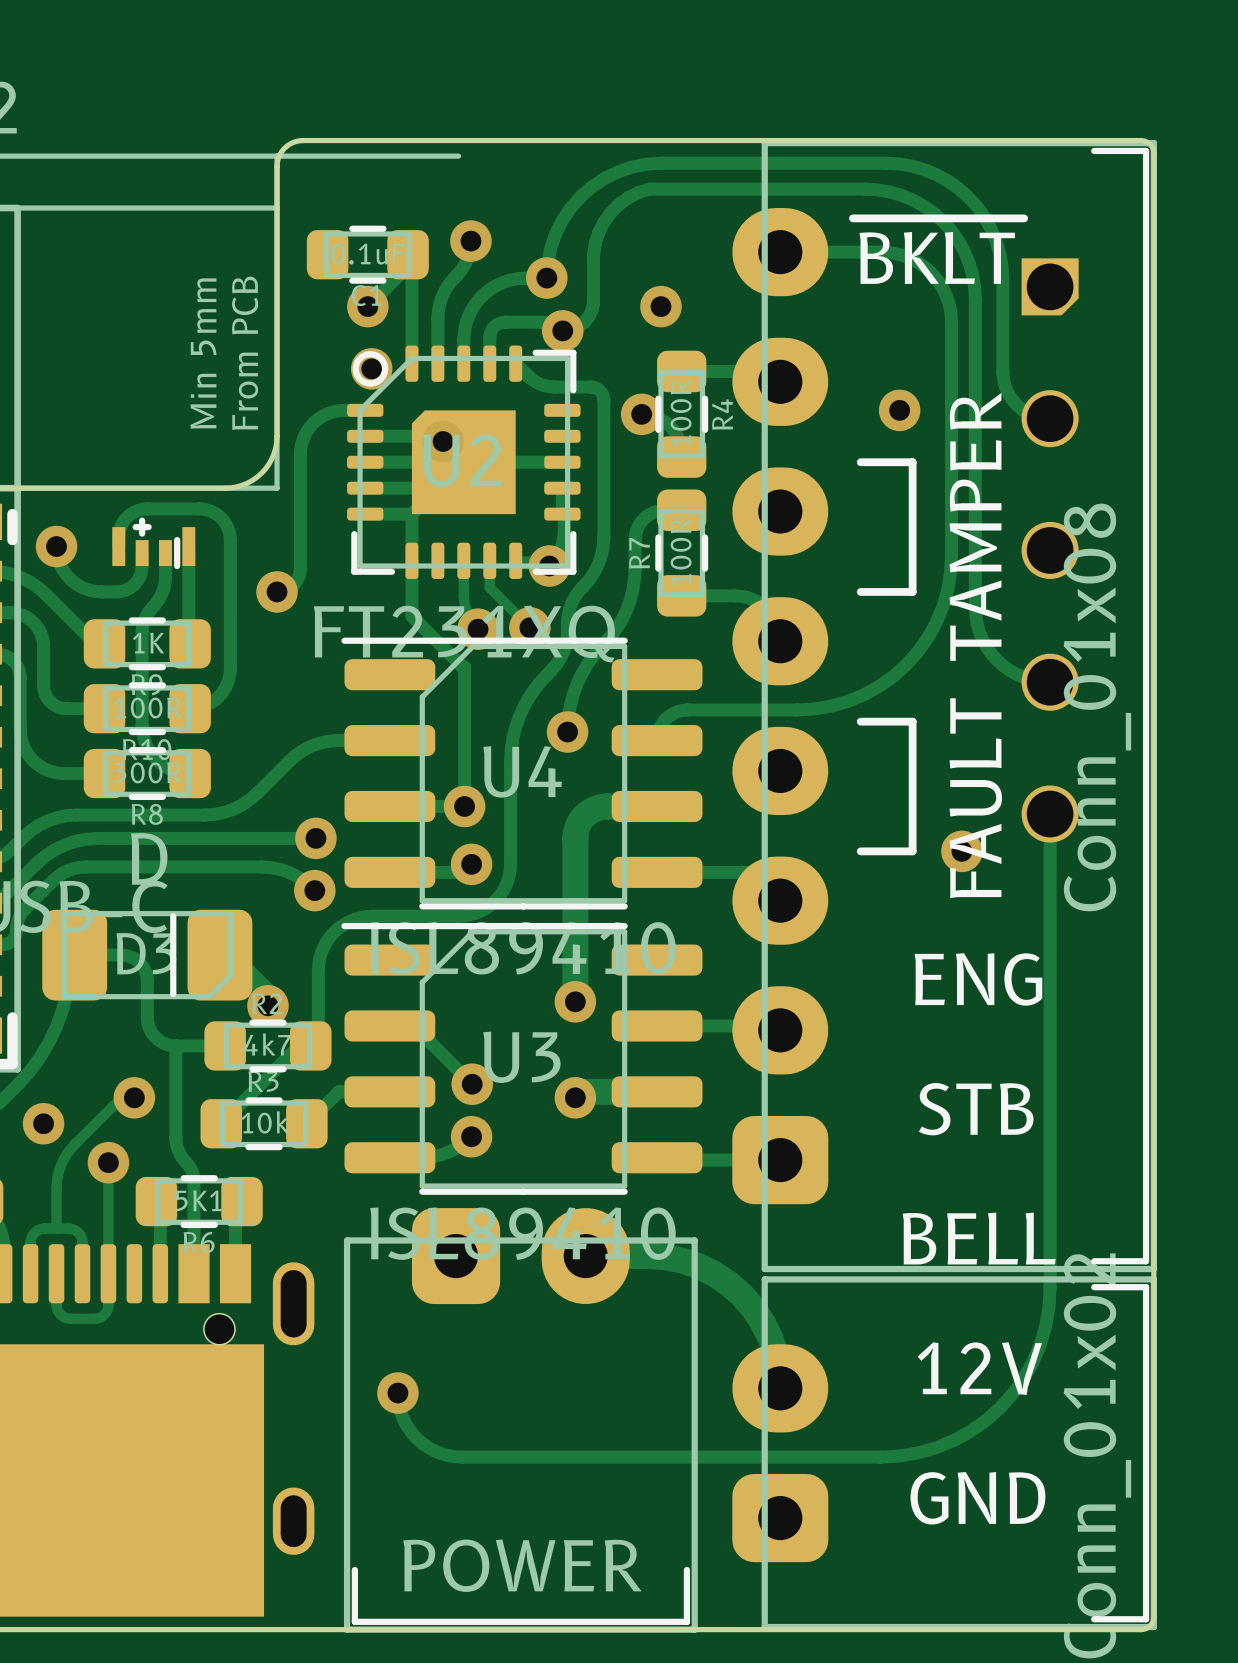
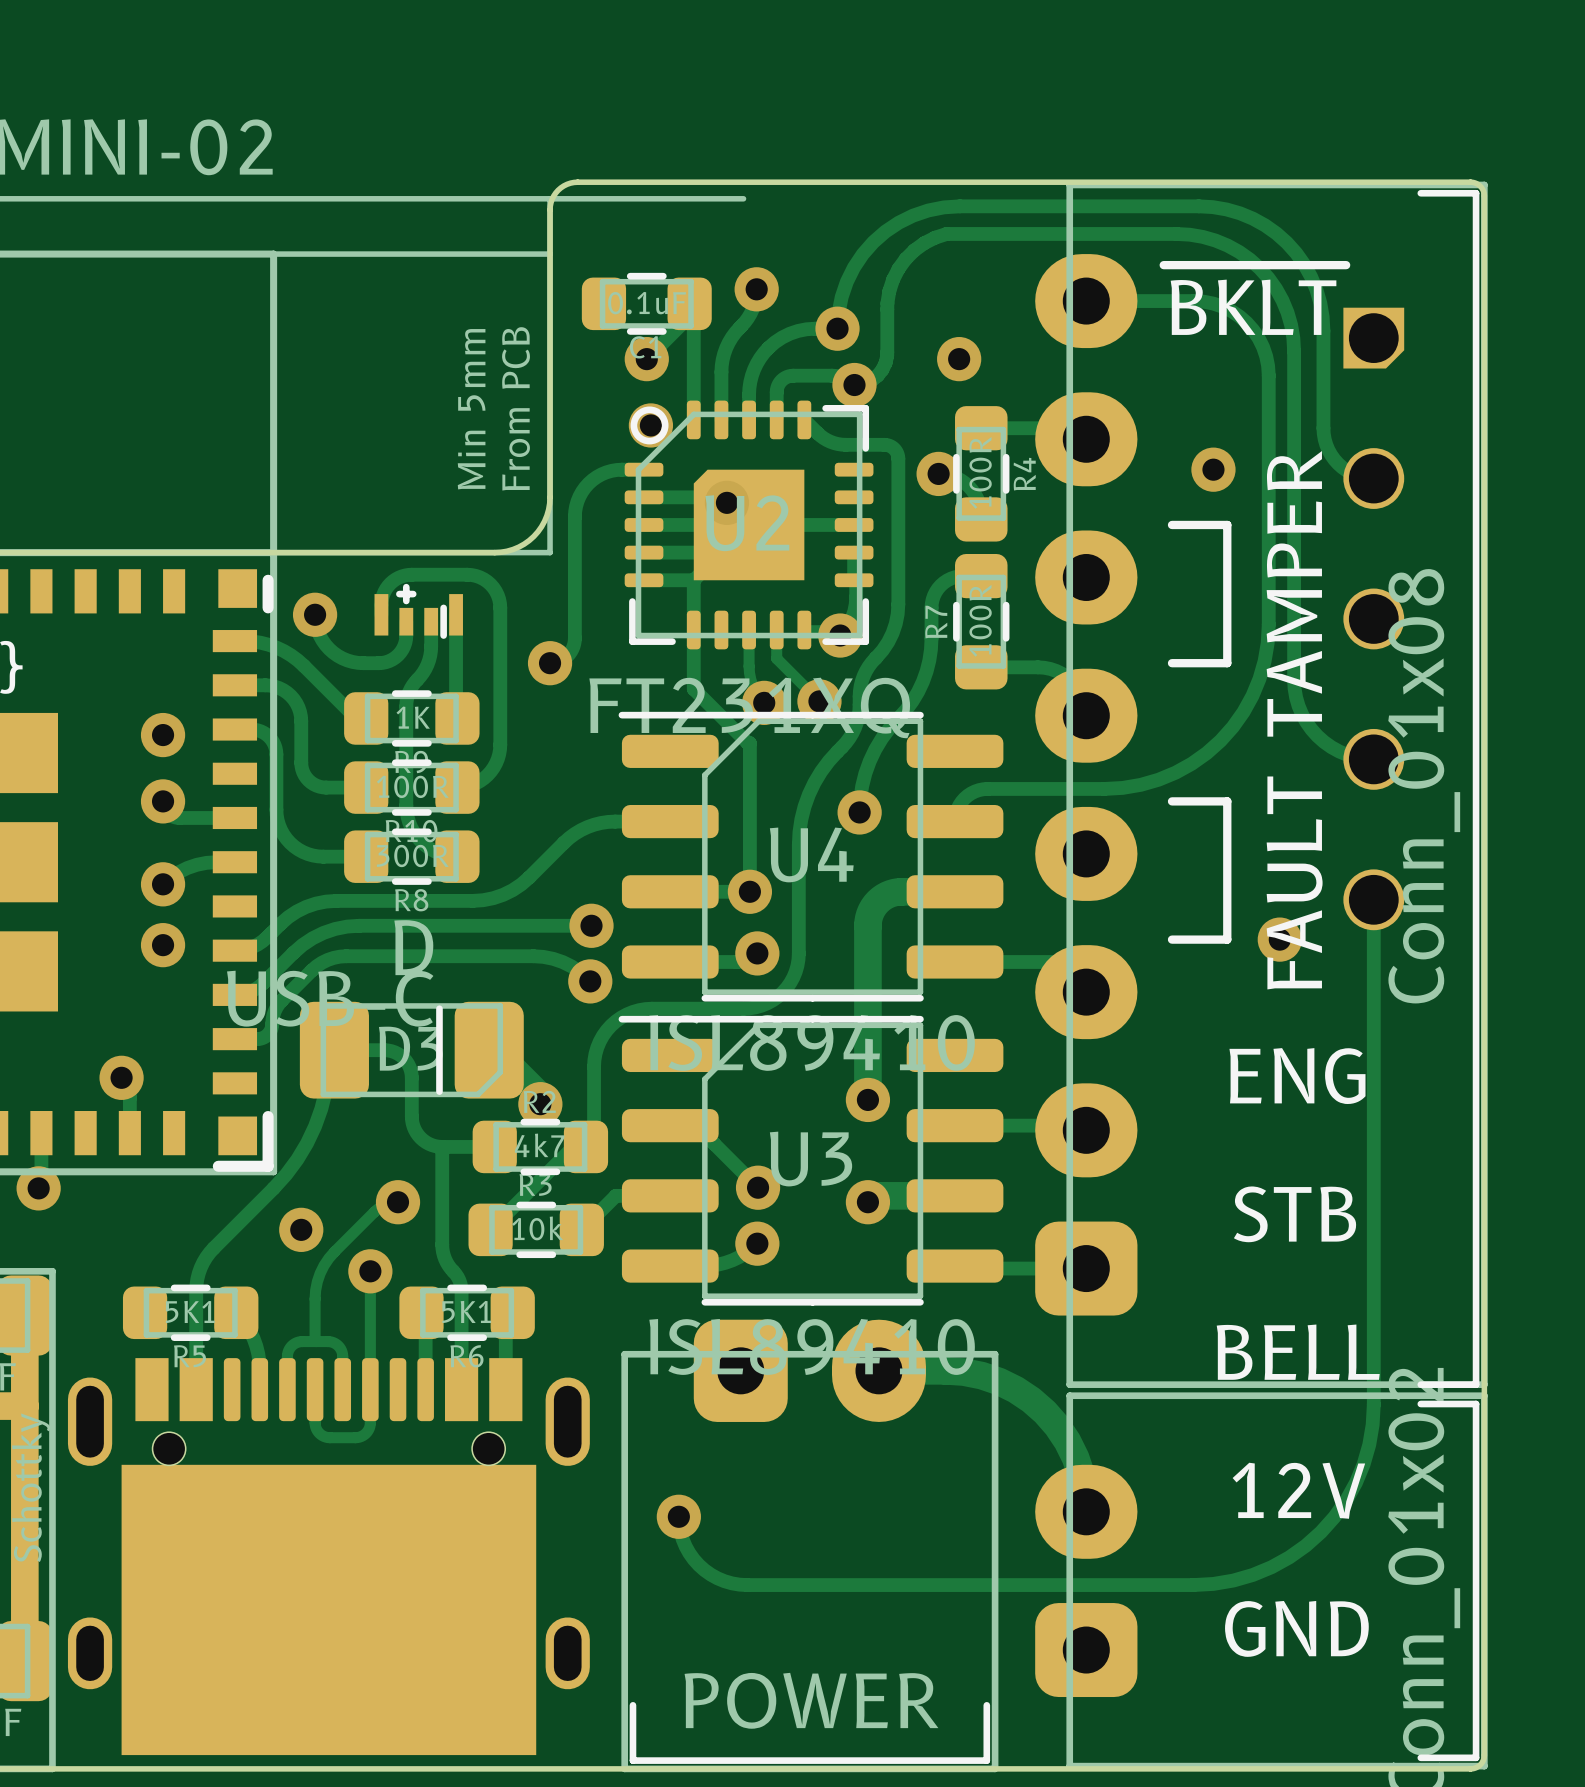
part footprint: [732, 140, 1157, 1273] -> [1035, 181, 1488, 1388]

